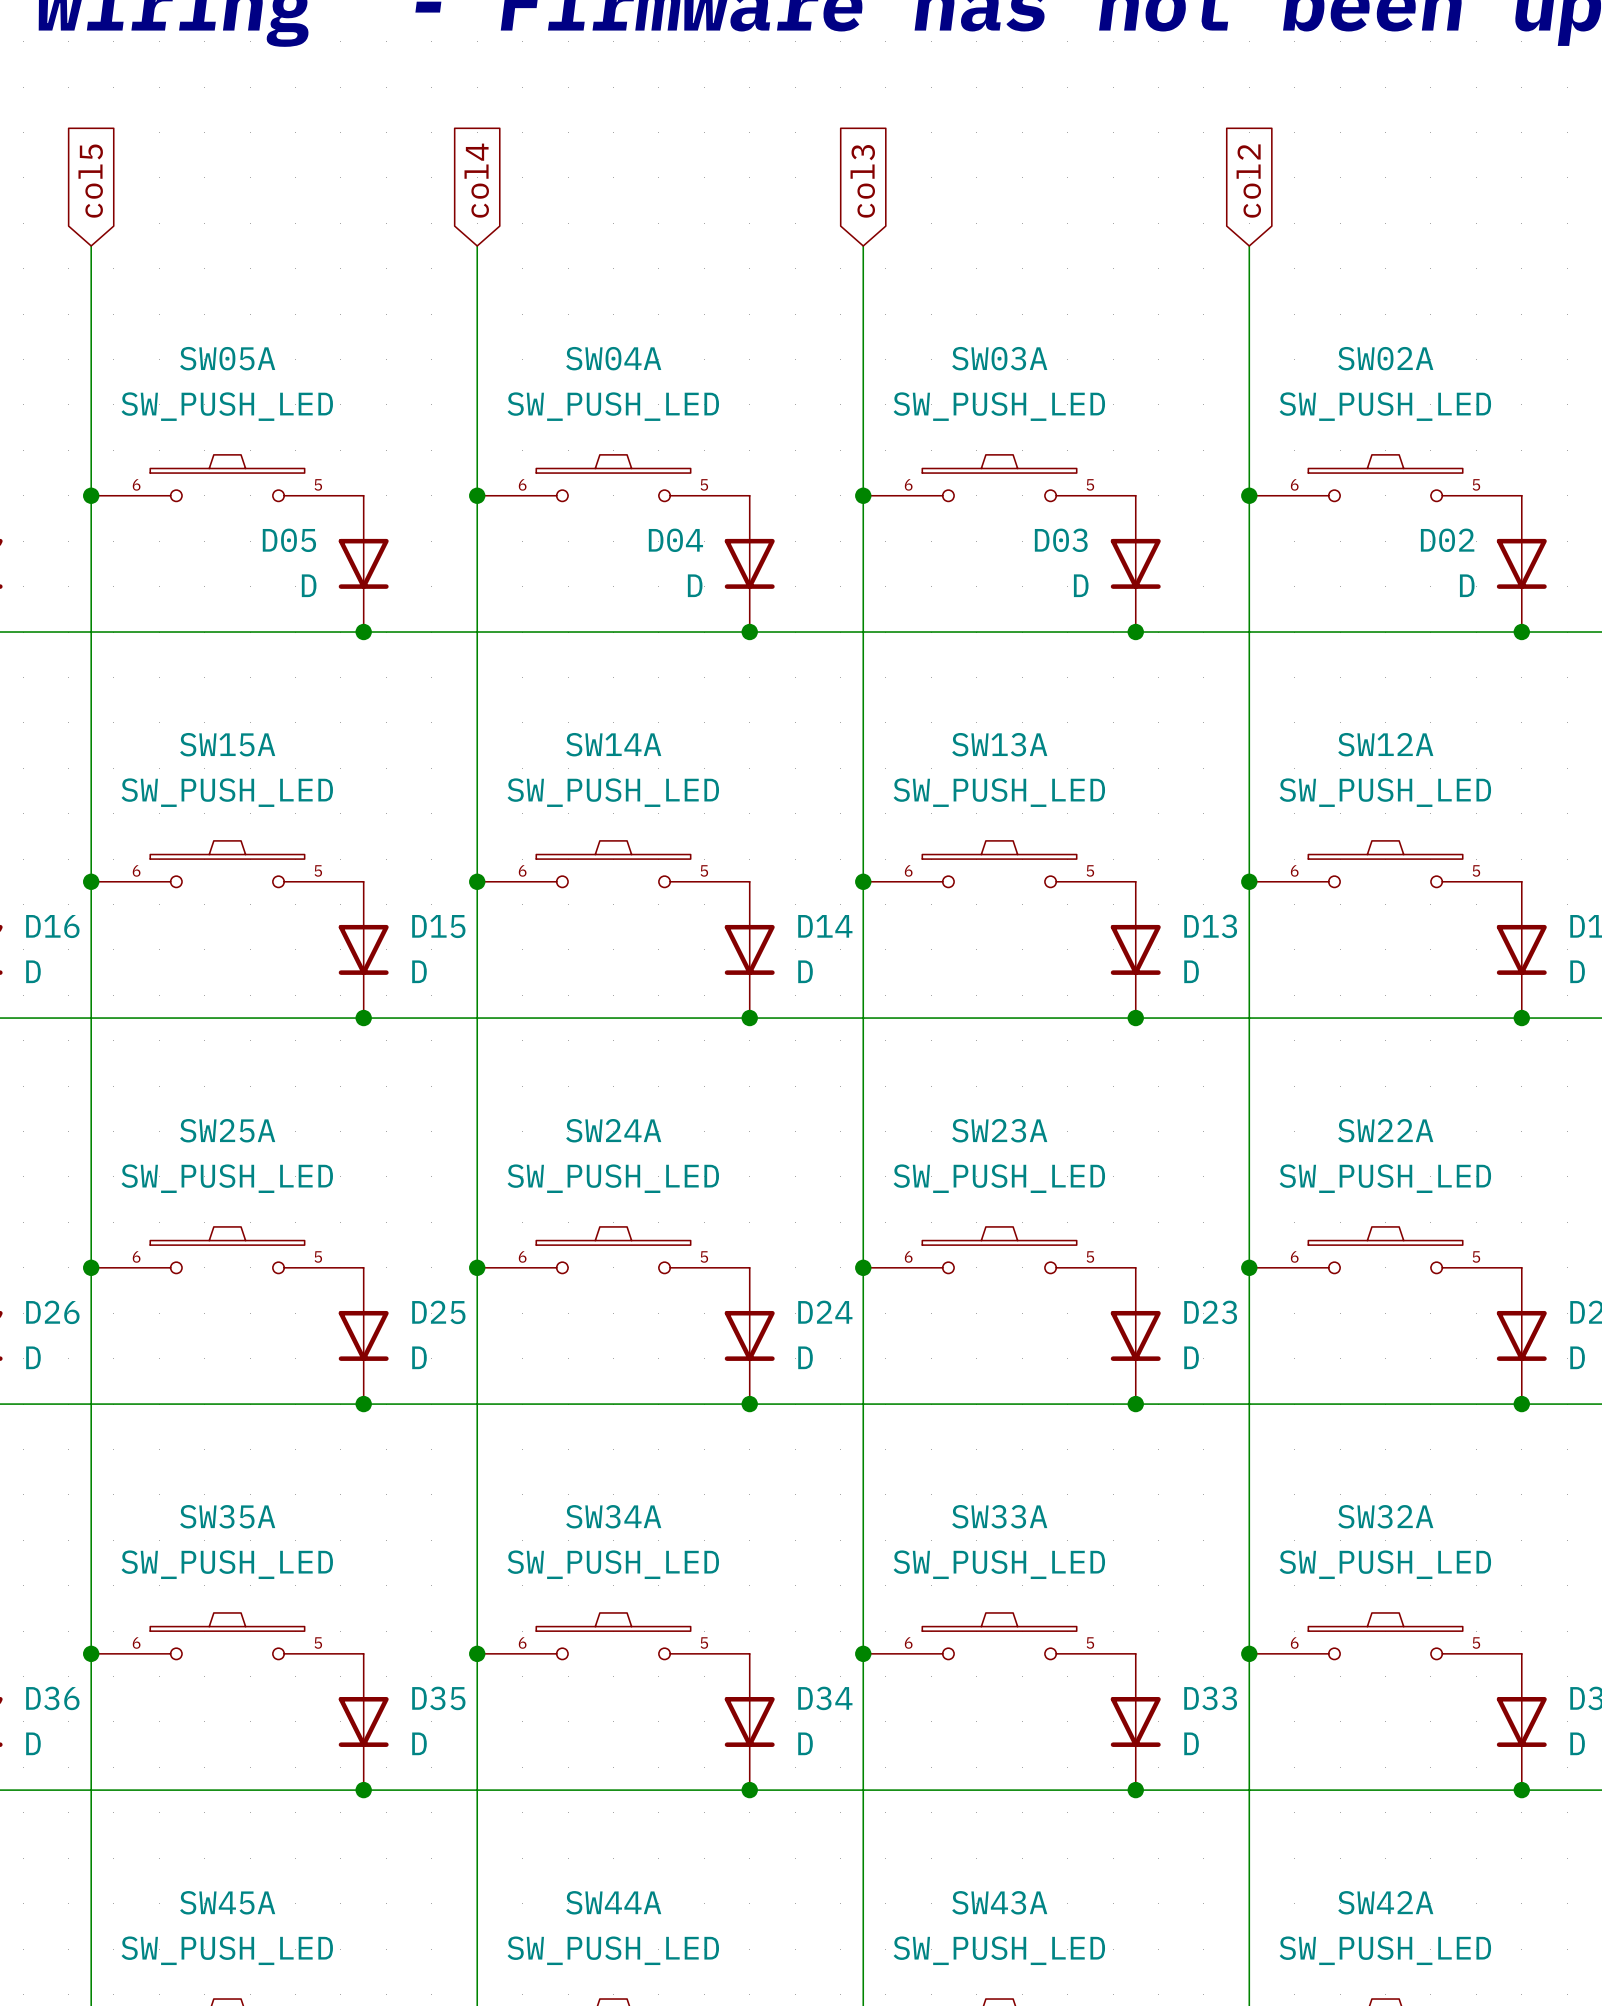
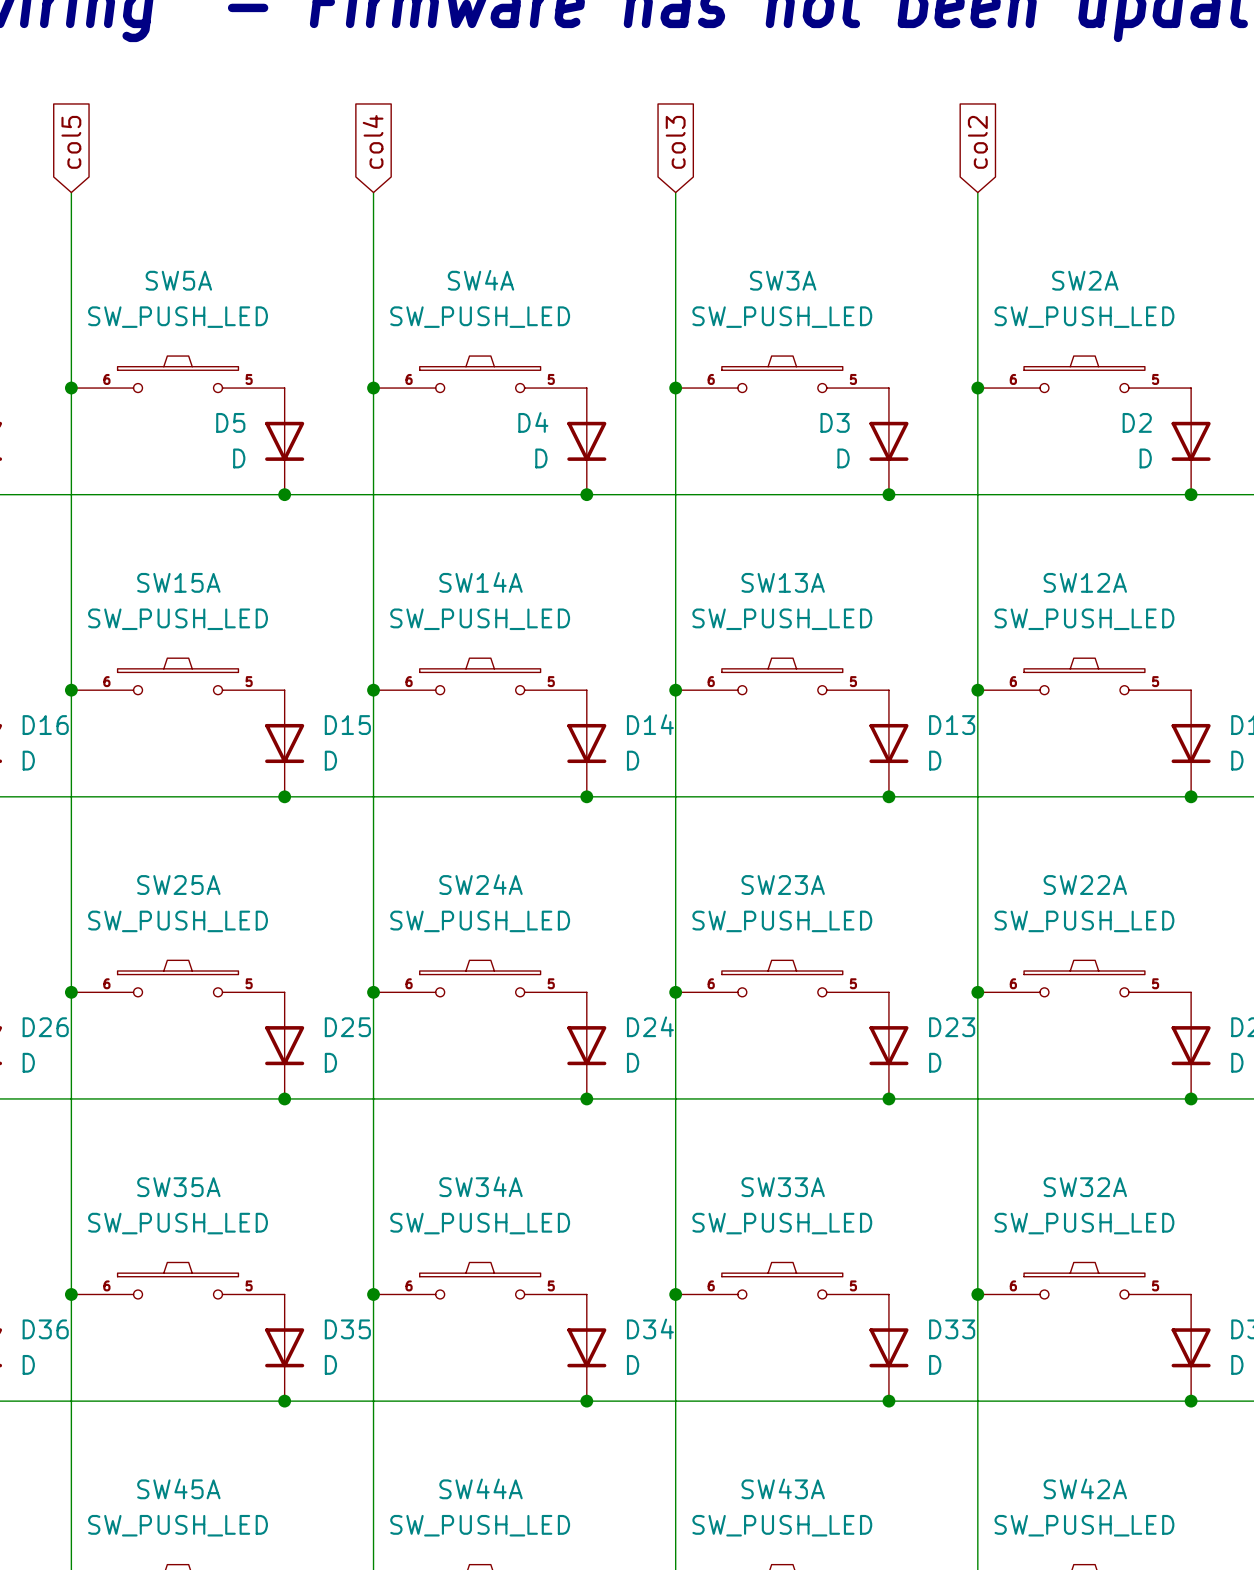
SW05A name: SW05A (227, 358) -> SW5A (178, 280)
SW04A name: SW04A (613, 358) -> SW4A (481, 280)
SW03A name: SW03A (999, 358) -> SW3A (783, 280)
SW02A name: SW02A (1385, 358) -> SW2A (1085, 280)
D05 name: D05 (289, 540) -> D5 (230, 422)
D04 name: D04 (675, 540) -> D4 (533, 422)
D03 name: D03 (1061, 540) -> D3 (835, 422)
D02 name: D02 (1447, 540) -> D2 (1137, 422)

